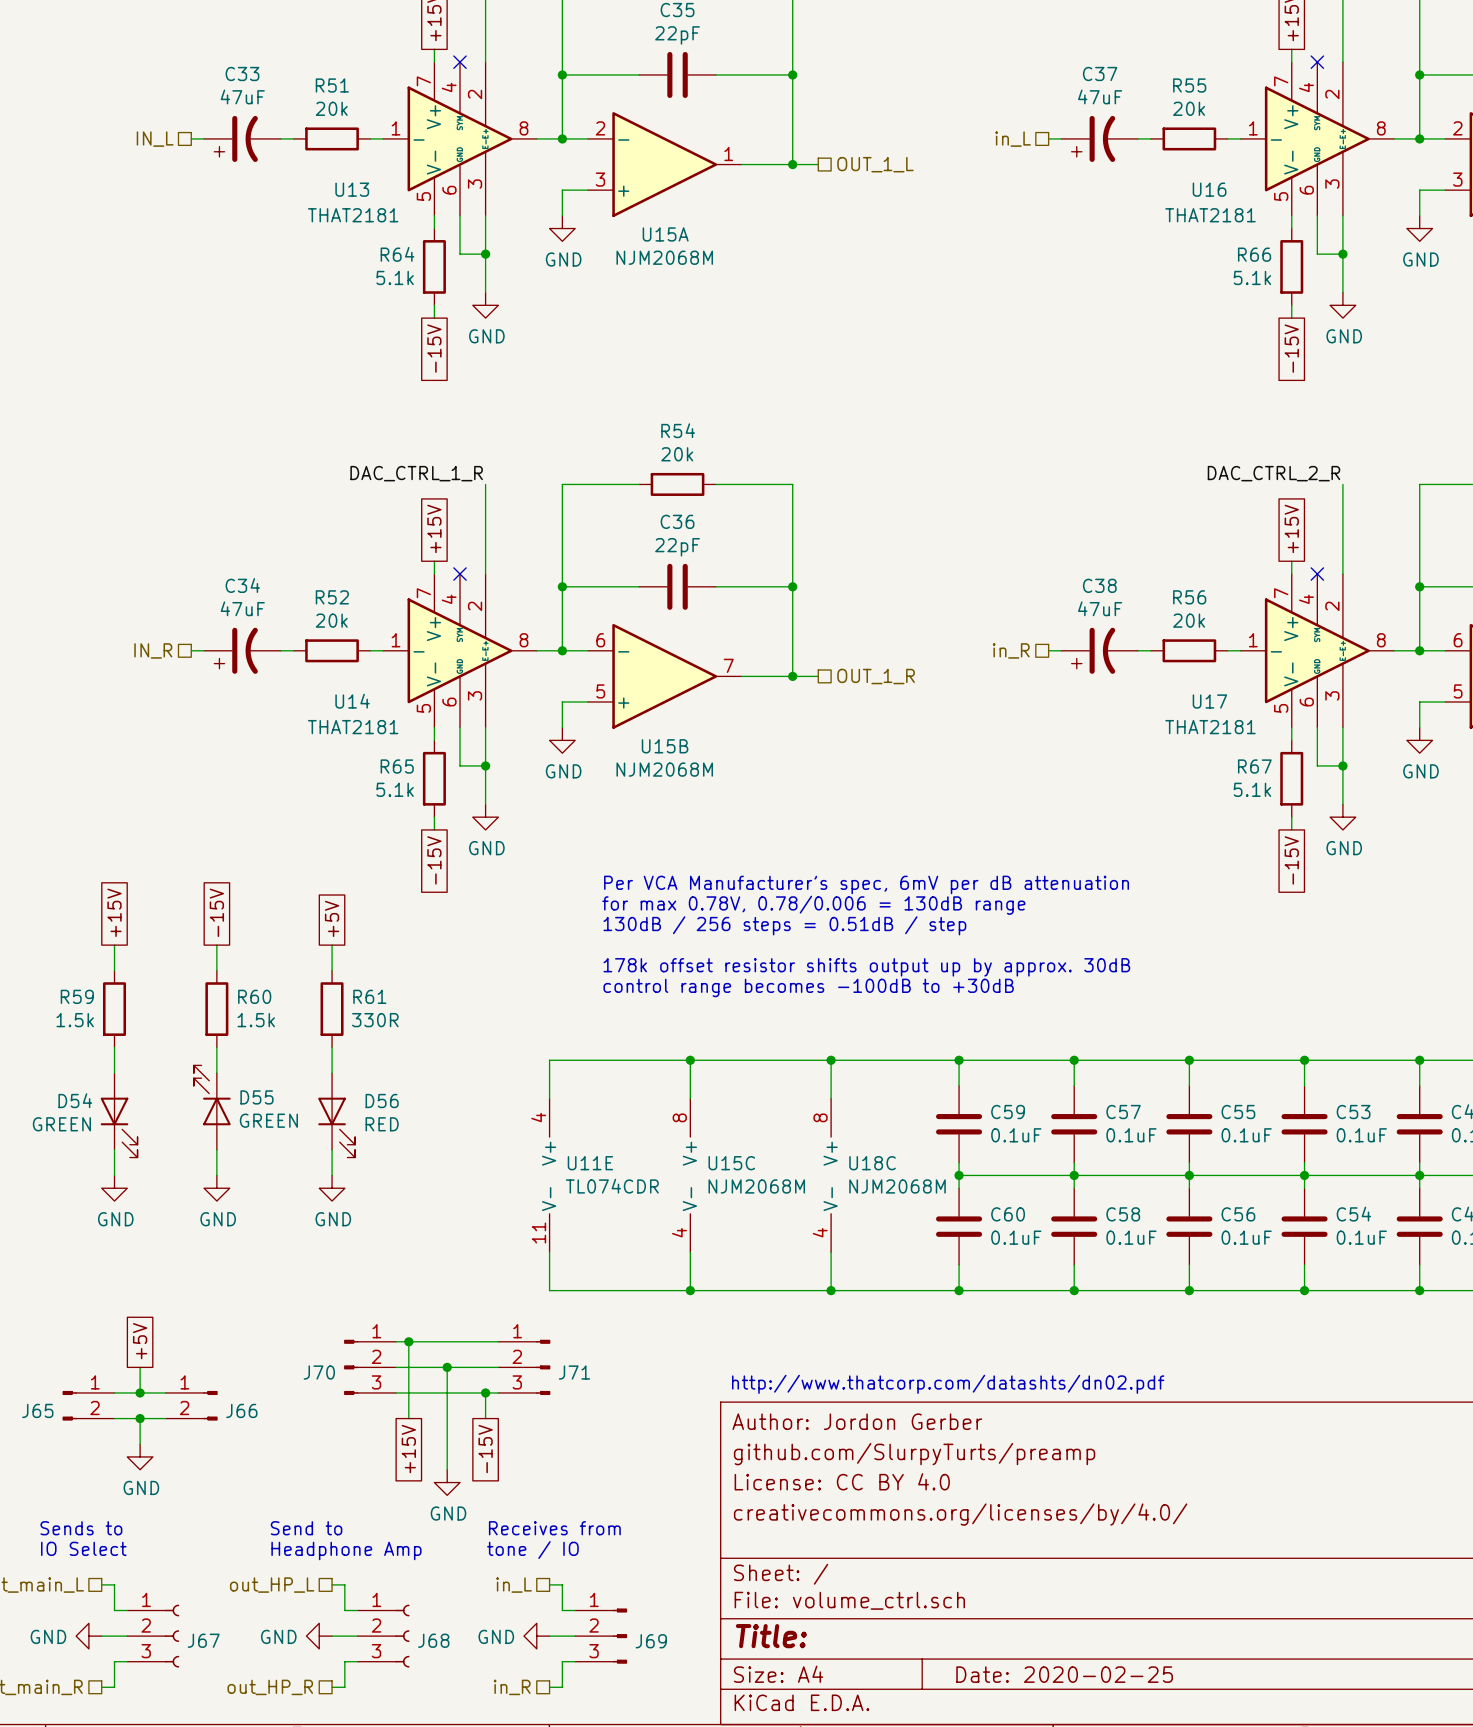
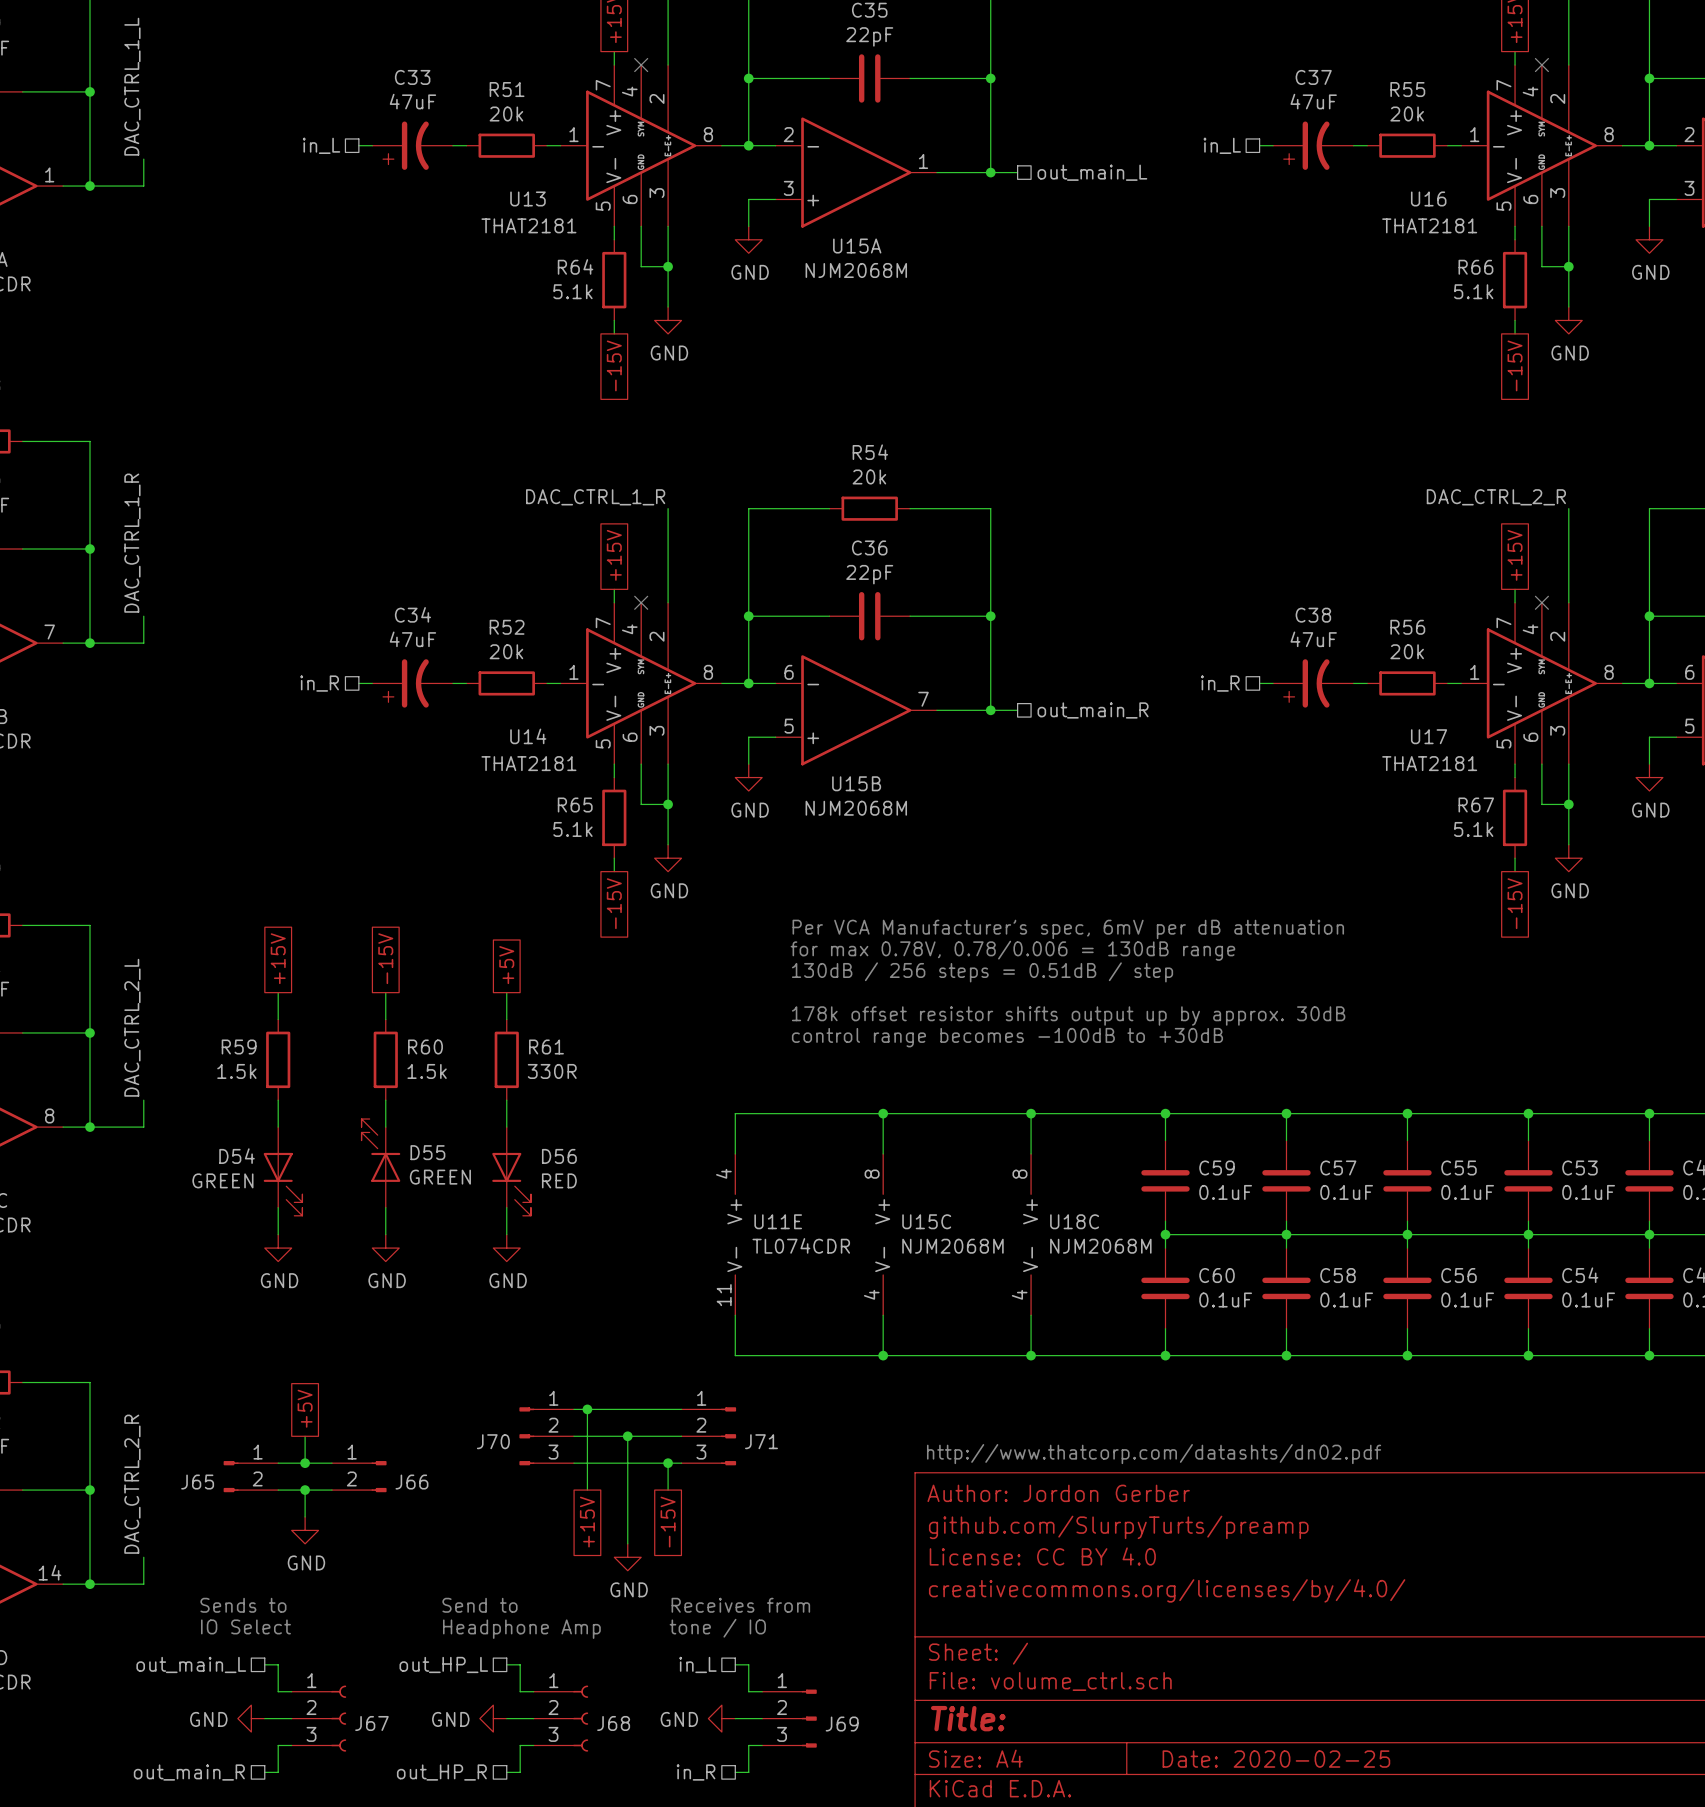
hierarchical label: IN_L (155, 139) -> in_L (321, 145)
hierarchical label: OUT_1_L (875, 164) -> out_main_L (1092, 172)
hierarchical label: IN_R (153, 650) -> in_R (319, 683)
hierarchical label: OUT_1_R (876, 676) -> out_main_R (1093, 710)

